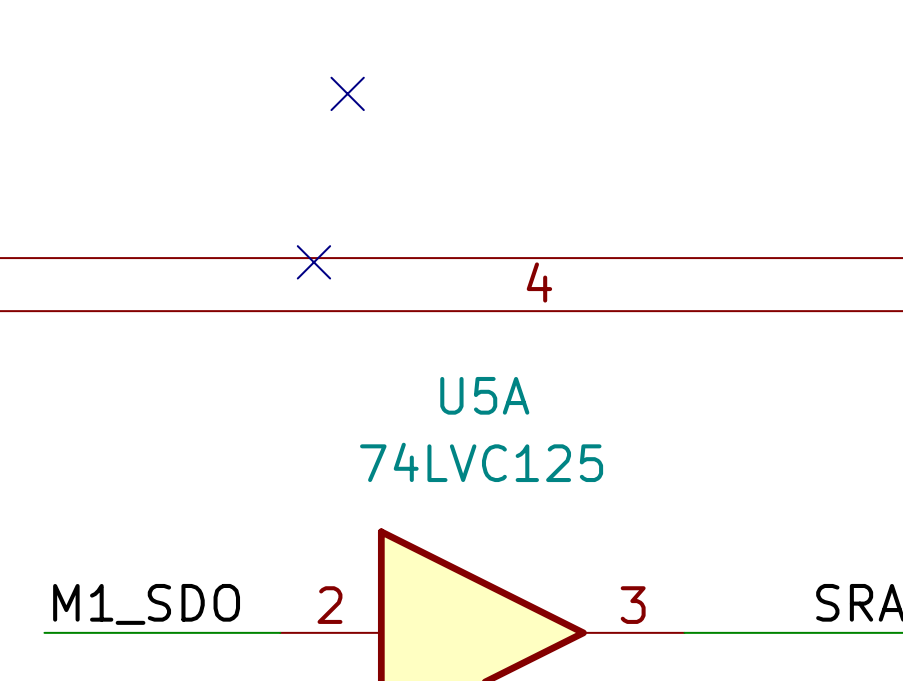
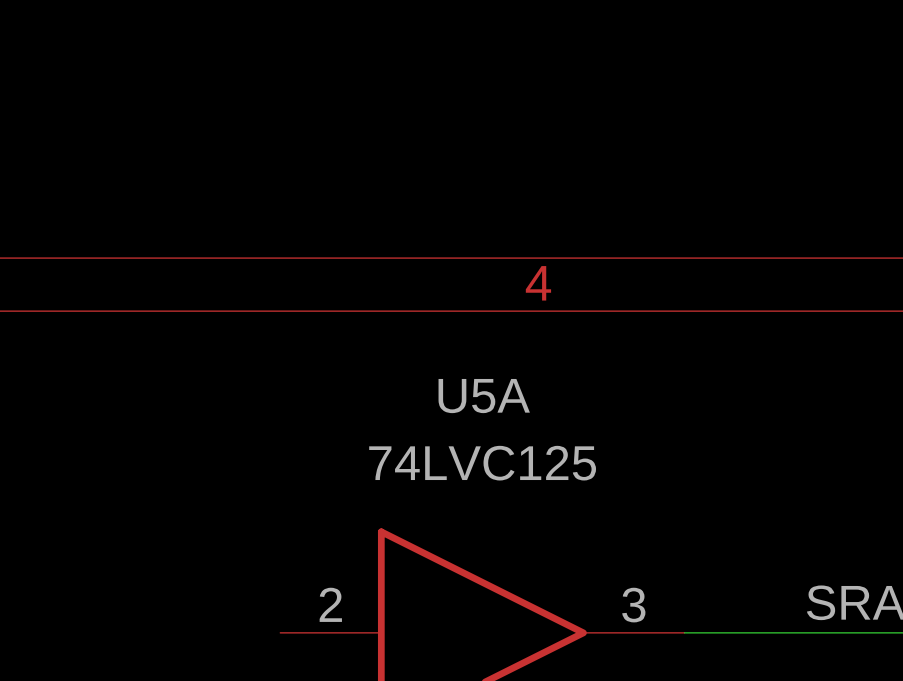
no-connect mark: (347, 93) -> none
no-connect mark: (313, 262) -> none
label: M1_SDO (146, 604) -> none
wire: (44, 632) (280, 632) -> none

